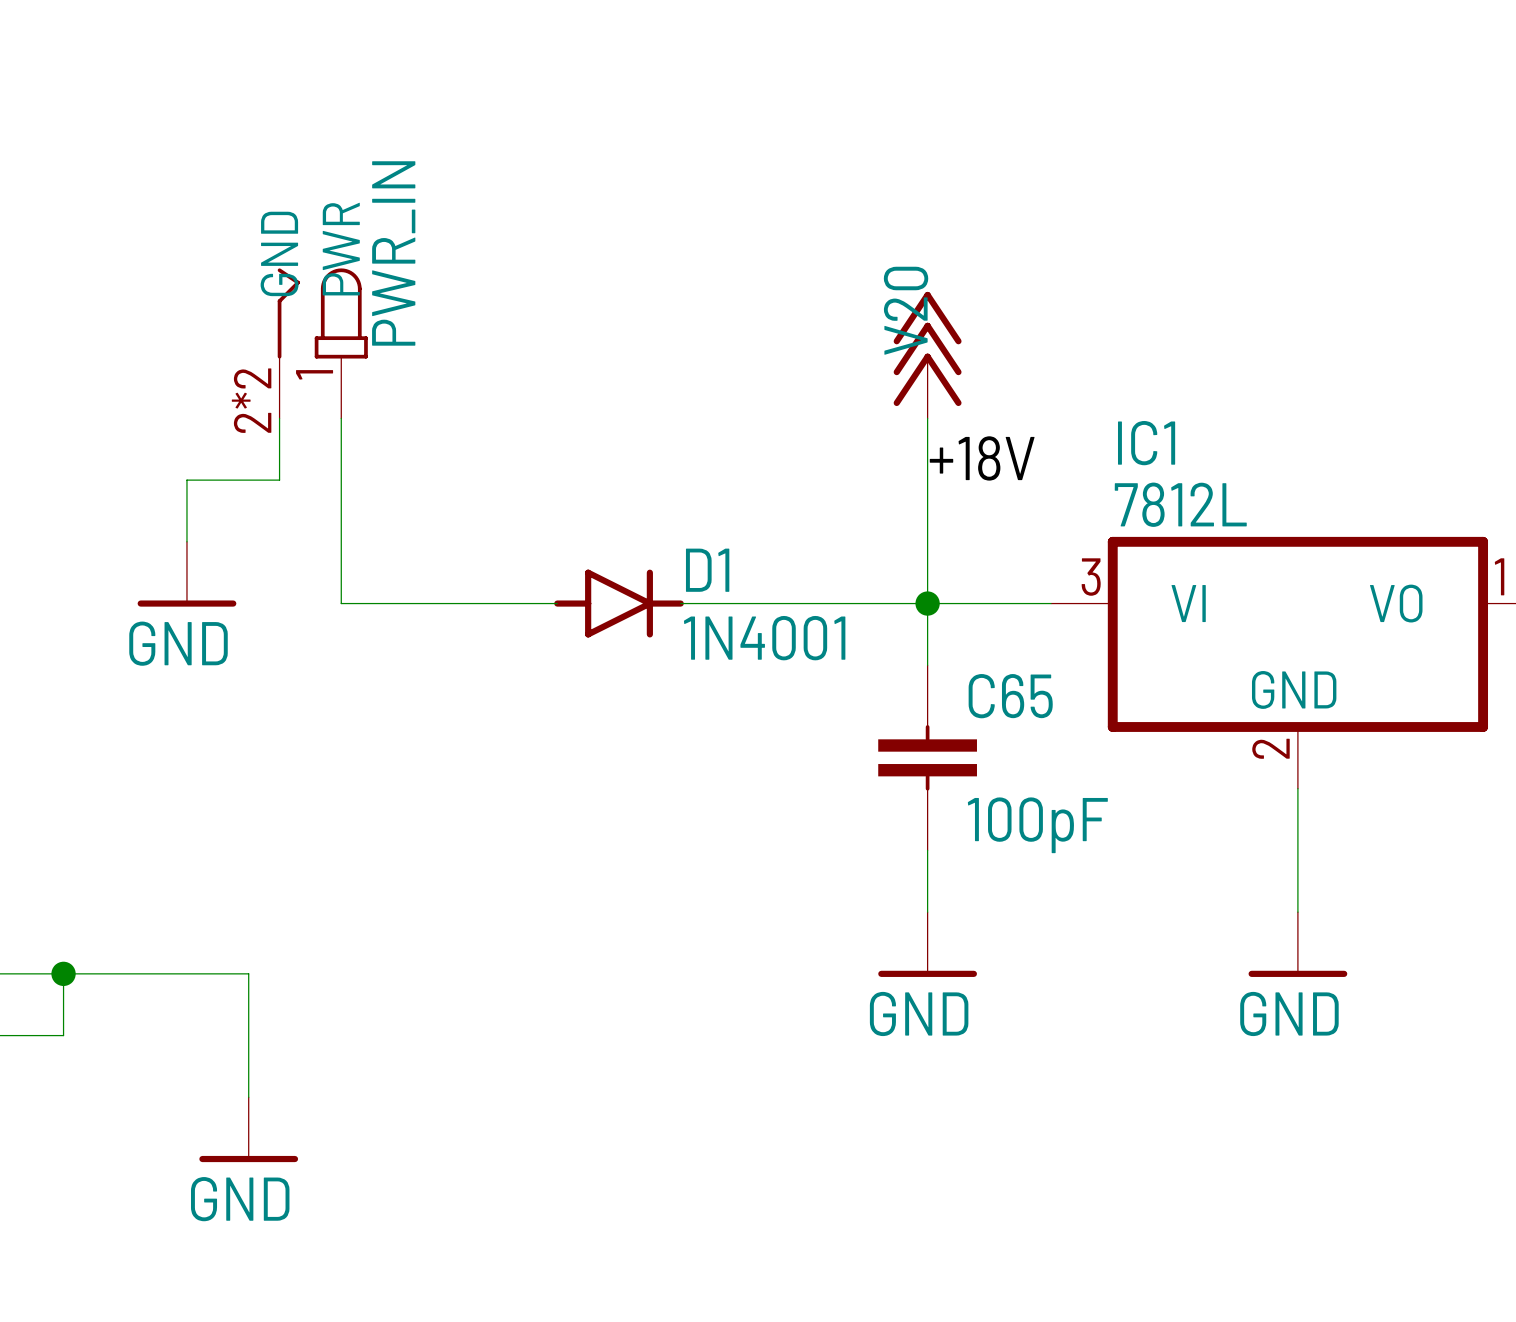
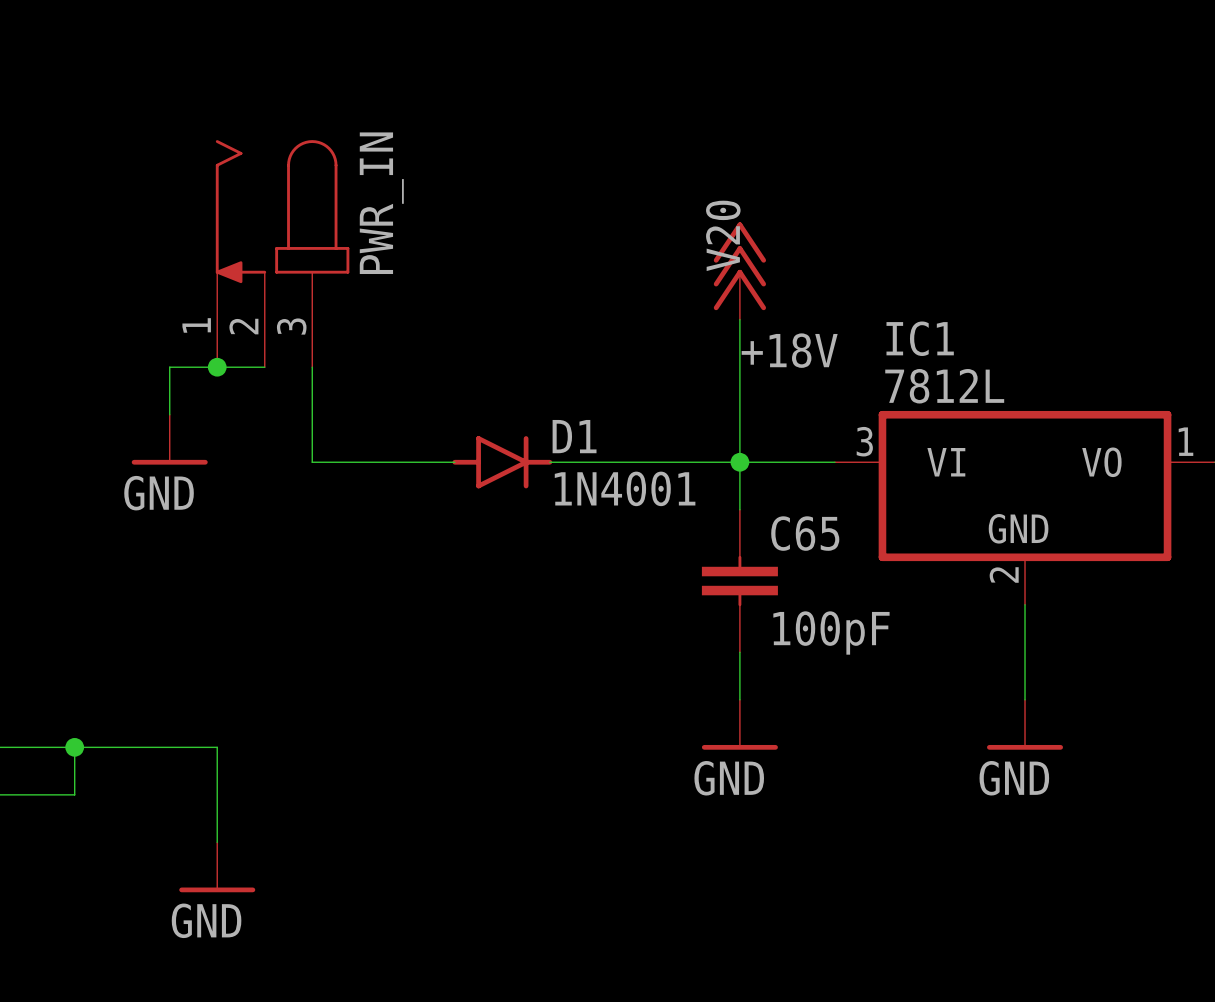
PWR_IN name position: PWR_IN (393, 253) -> PWR_IN (381, 203)
PWR_IN symbol: [277, 268, 368, 419] -> [215, 140, 350, 368]
wire: (279, 418) (279, 480) -> (264, 367) (241, 367)
wire: (341, 418) (341, 603) (372, 603) -> (312, 367) (312, 462)
junction: none -> (217, 367)

